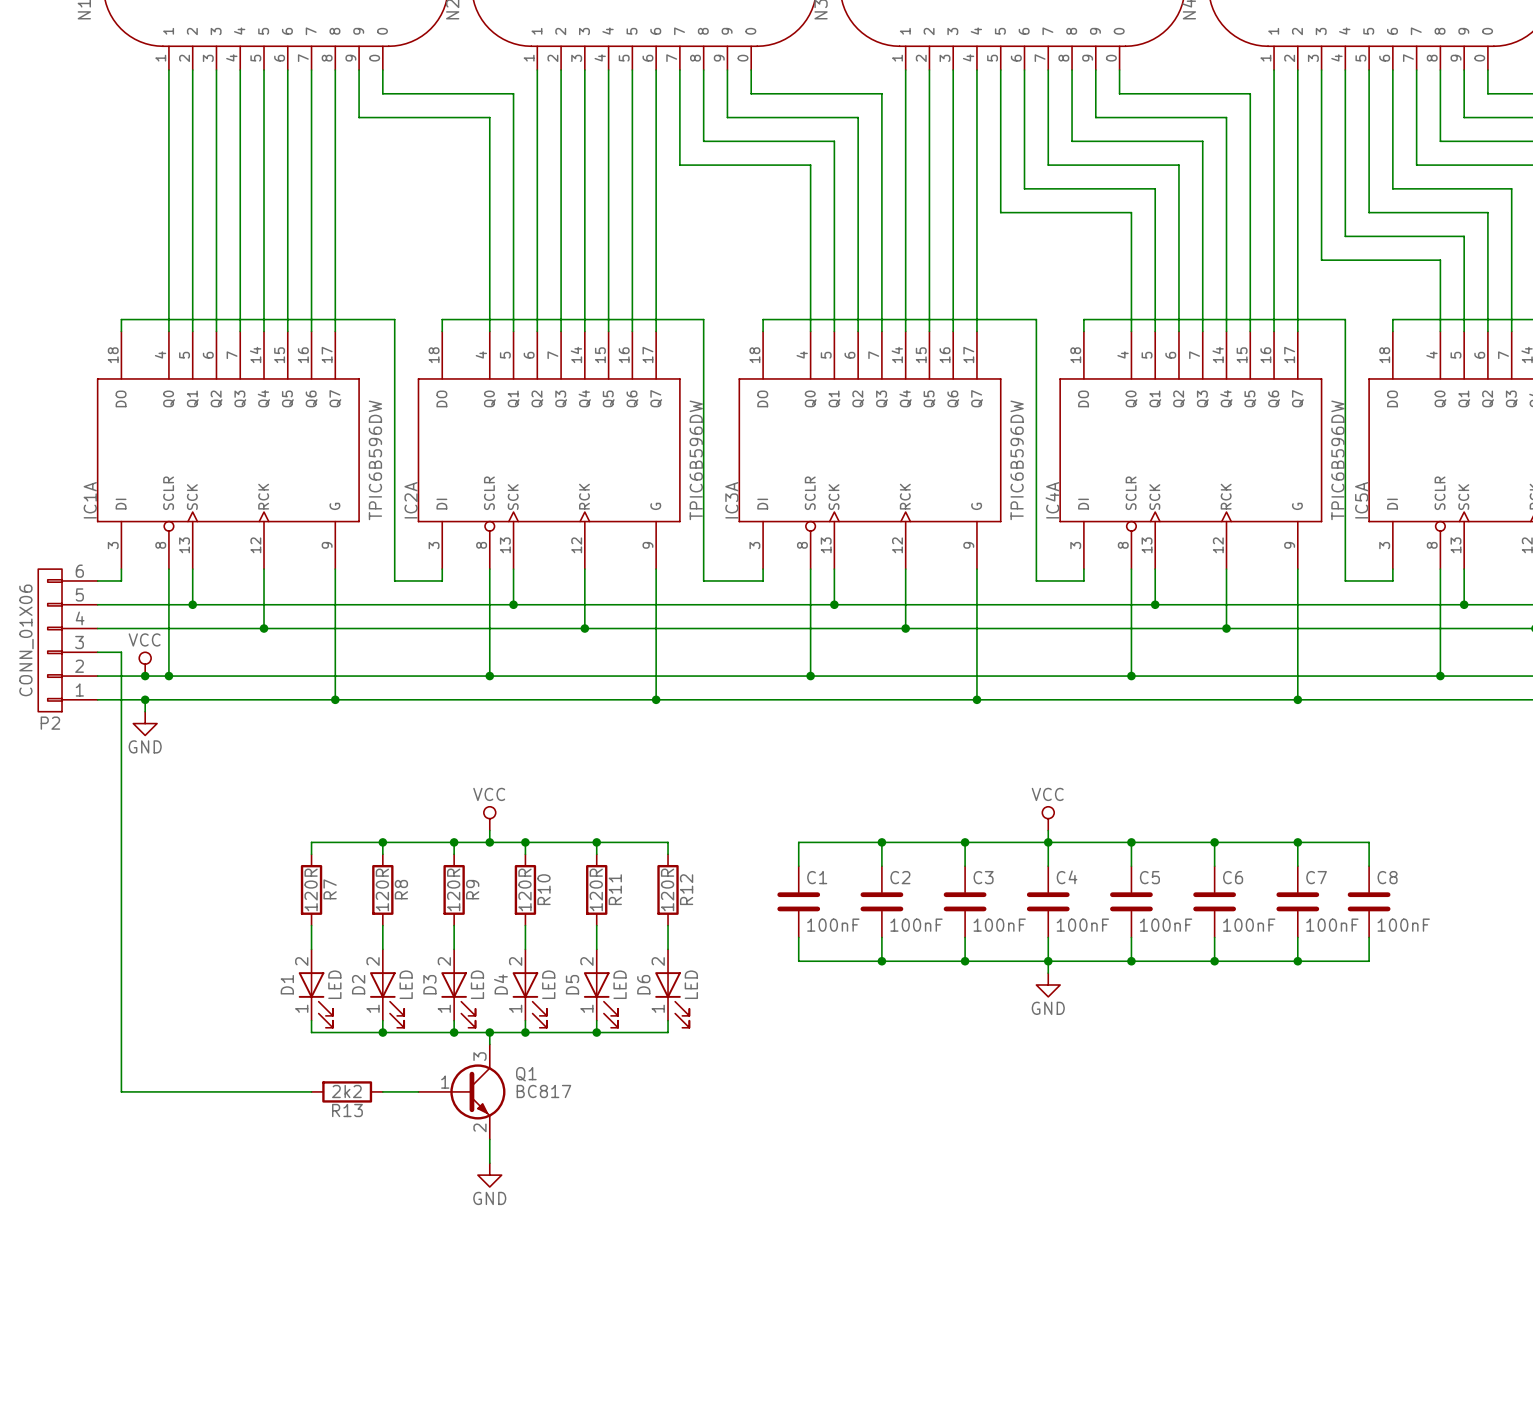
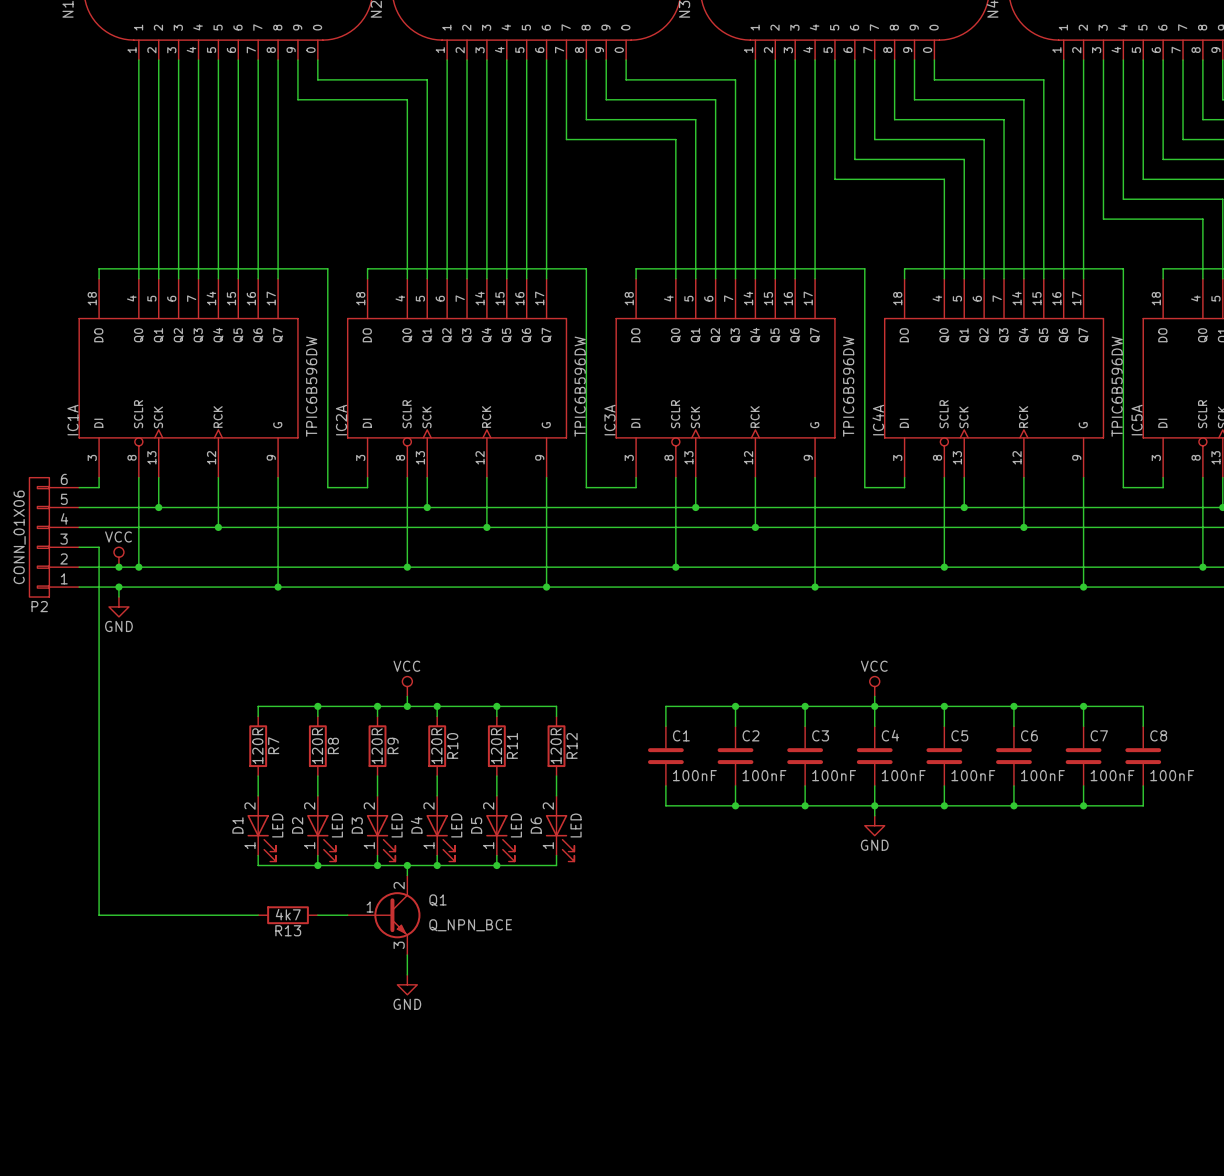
Q1 pin number: 3 (479, 1056) -> 2 (399, 885)
R13 value: 2k2 (346, 1091) -> 4k7 (288, 914)
Q1 value: BC817 (543, 1091) -> Q_NPN_BCE (470, 925)
Q1 pin number: 2 (479, 1127) -> 3 (399, 945)

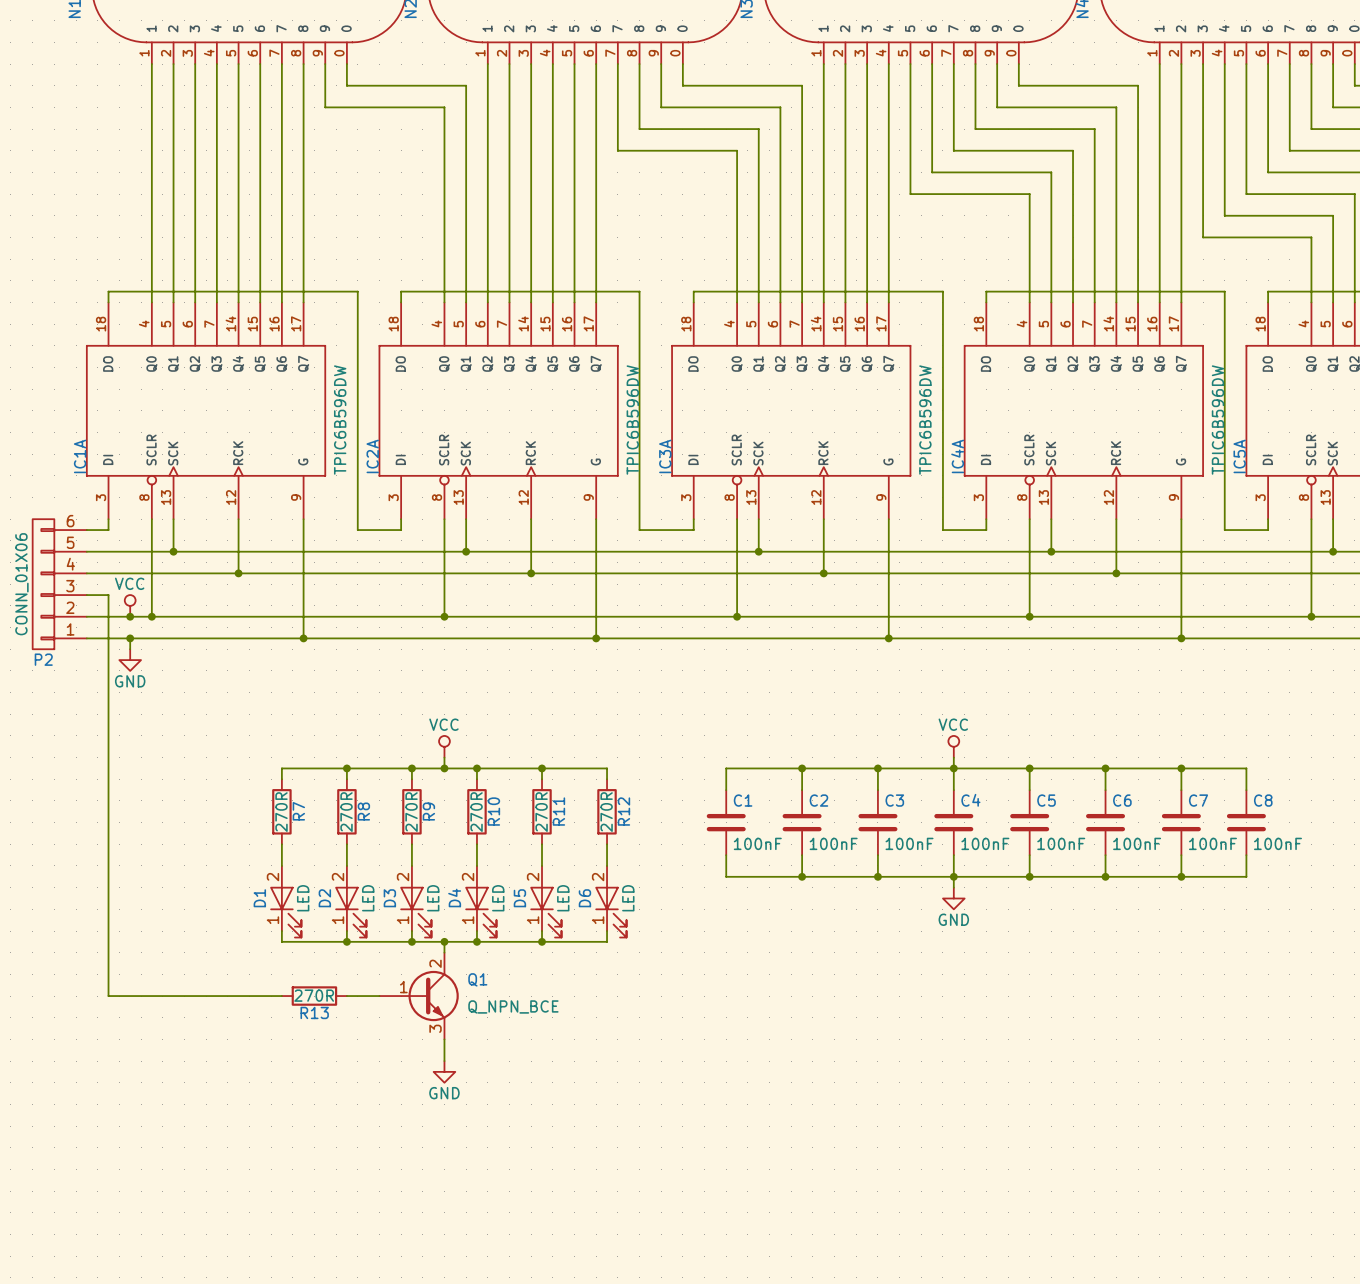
R7 value: 120R (257, 746) -> 270R (281, 812)
R8 value: 120R (317, 746) -> 270R (346, 812)
R9 value: 120R (377, 746) -> 270R (411, 812)
R10 value: 120R (436, 746) -> 270R (476, 812)
R11 value: 120R (496, 746) -> 270R (541, 812)
R12 value: 120R (556, 746) -> 270R (606, 812)
R13 value: 4k7 (288, 914) -> 270R (314, 995)

